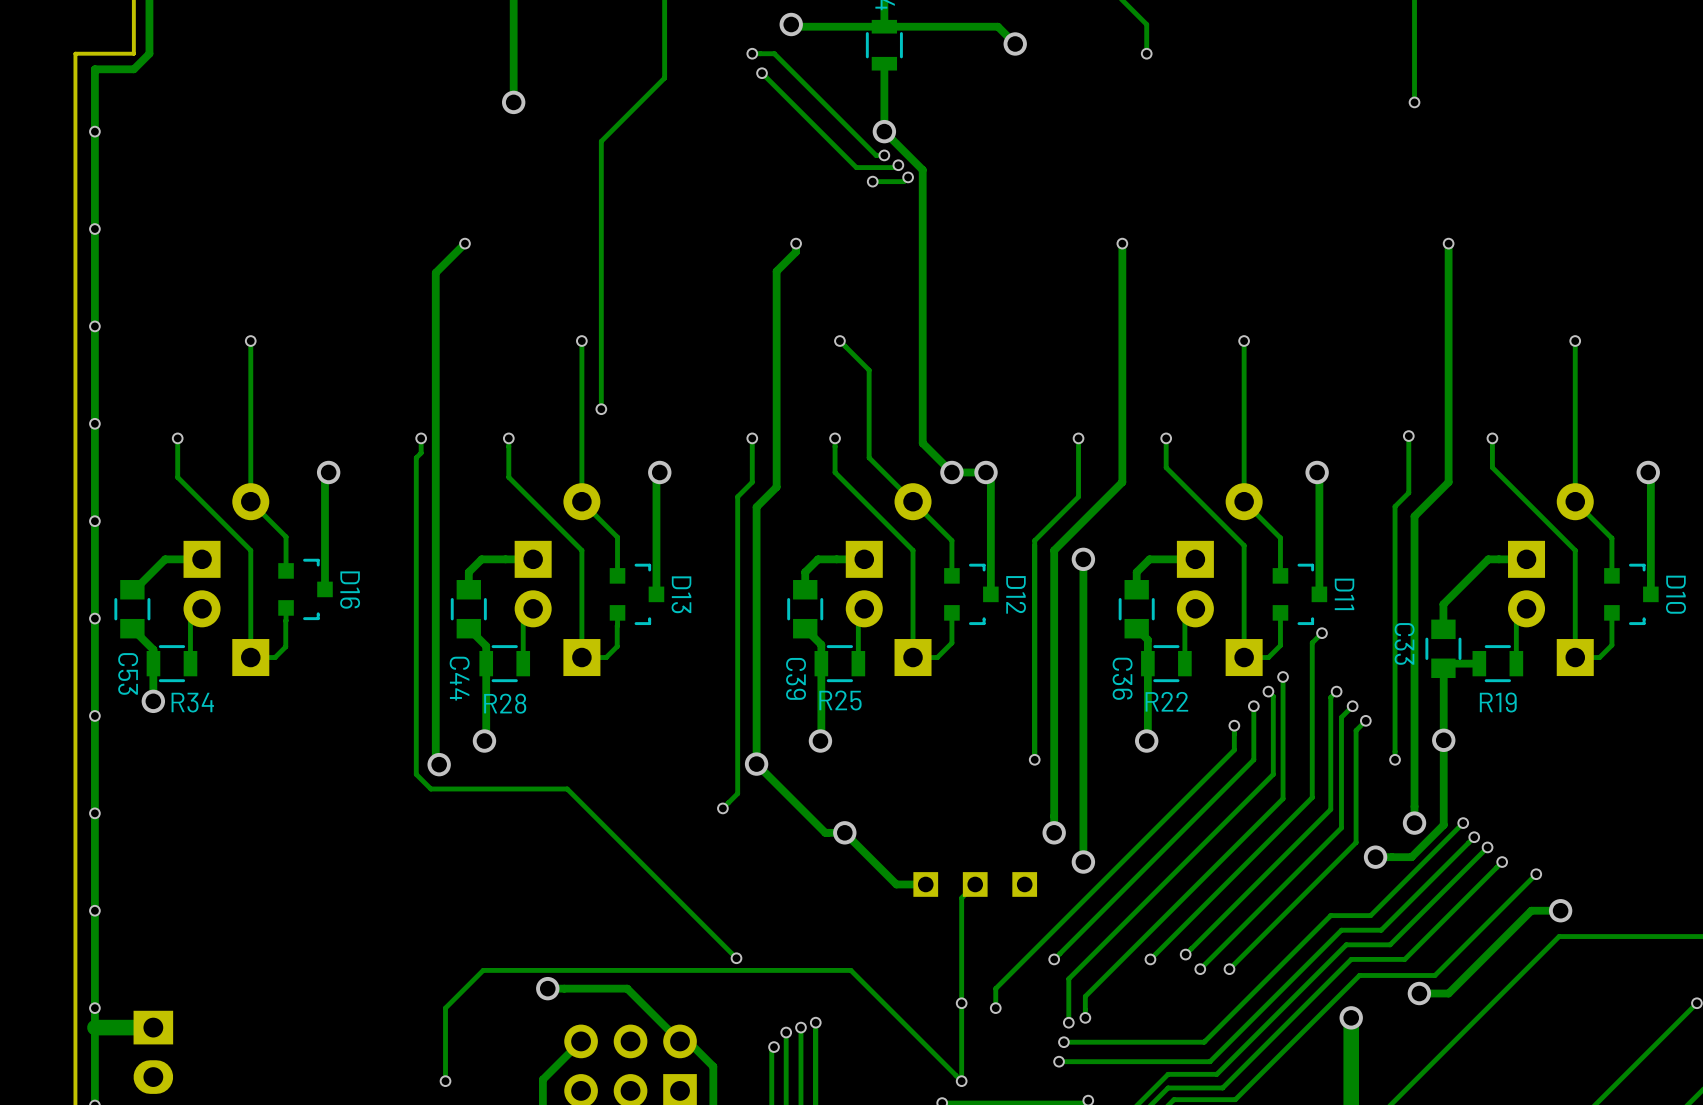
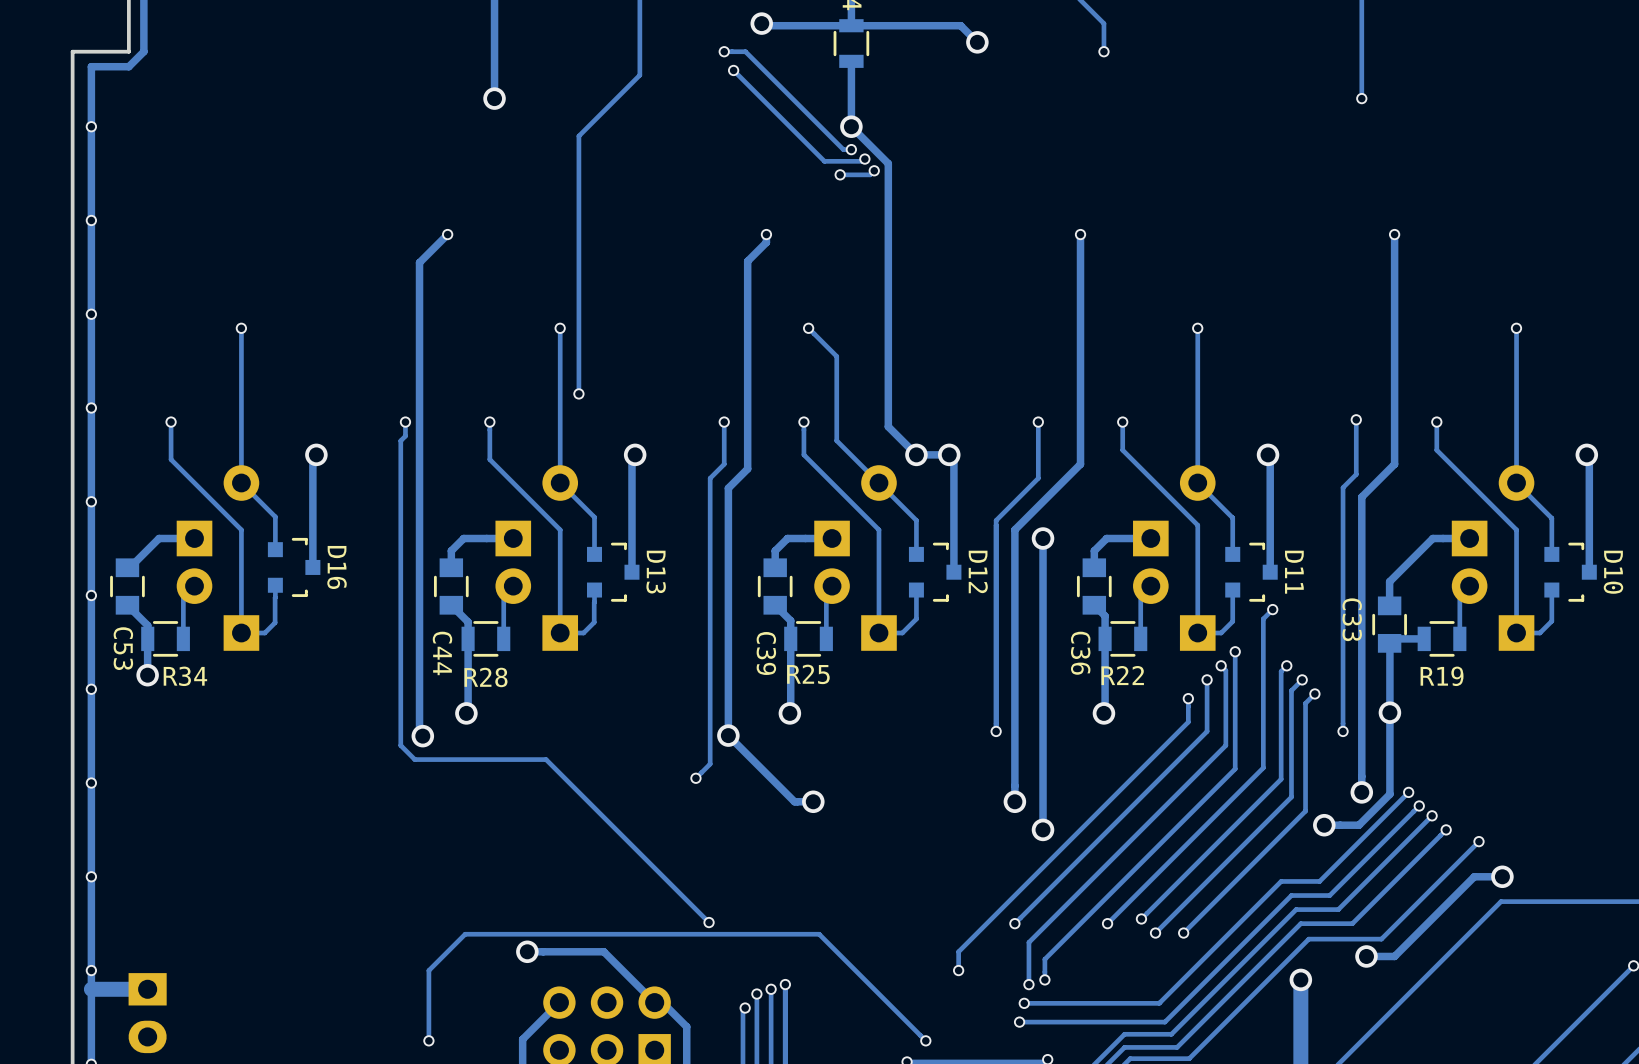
track: (844, 832) (896, 884) (925, 884) -> none
track: (975, 884) (961, 898) (961, 1081) -> none
part: (975, 884) -> none
via: (961, 1003) -> none

